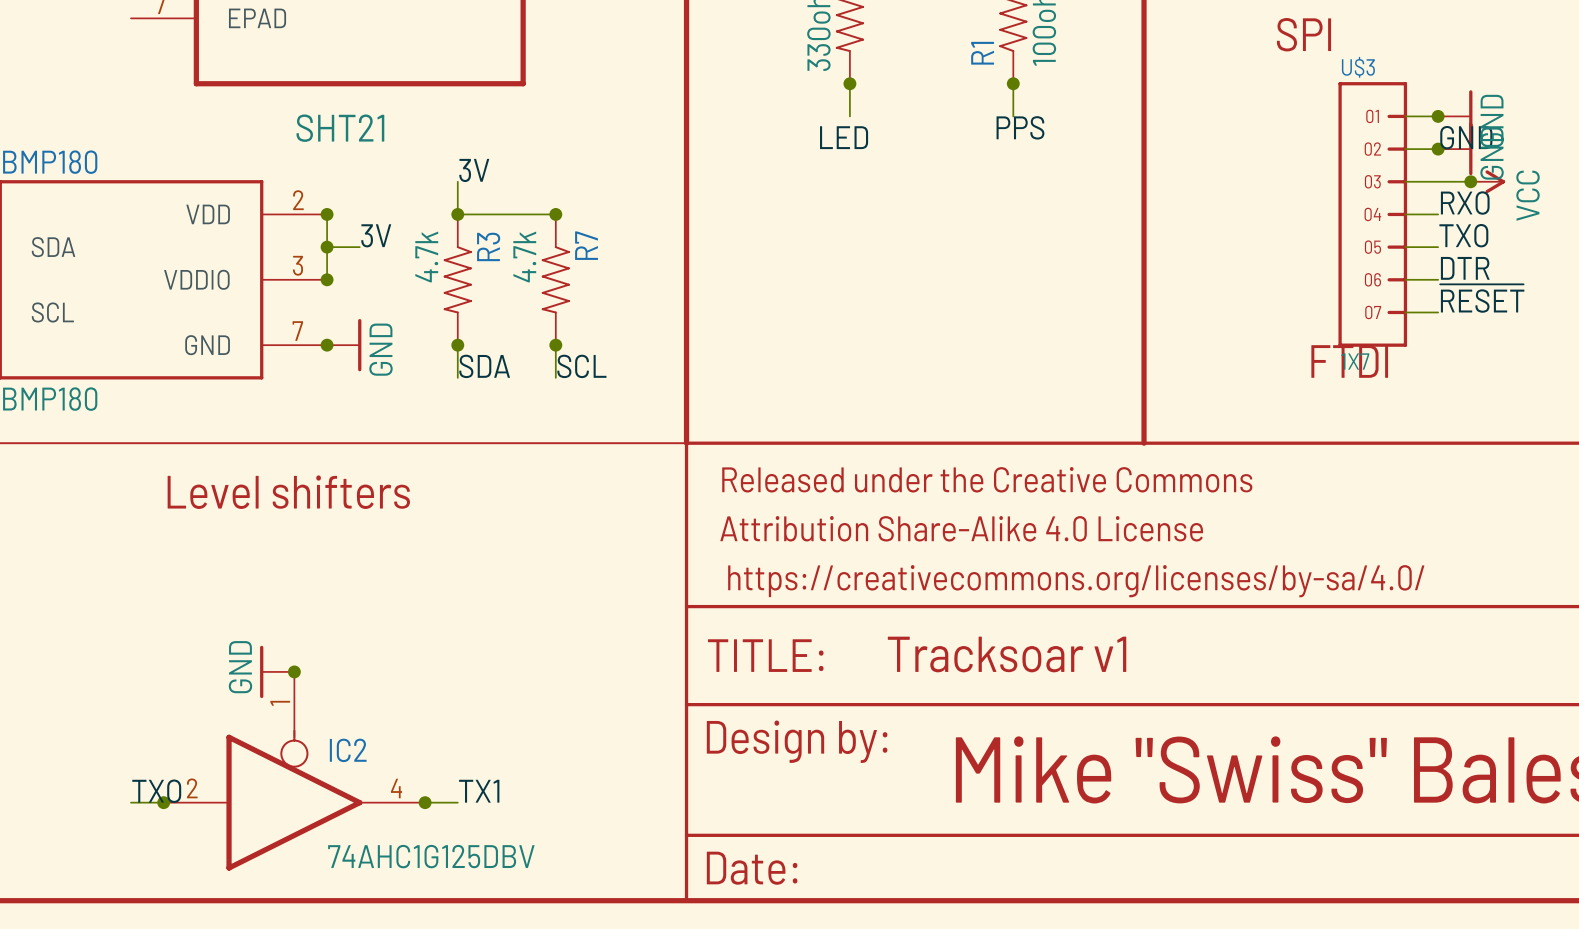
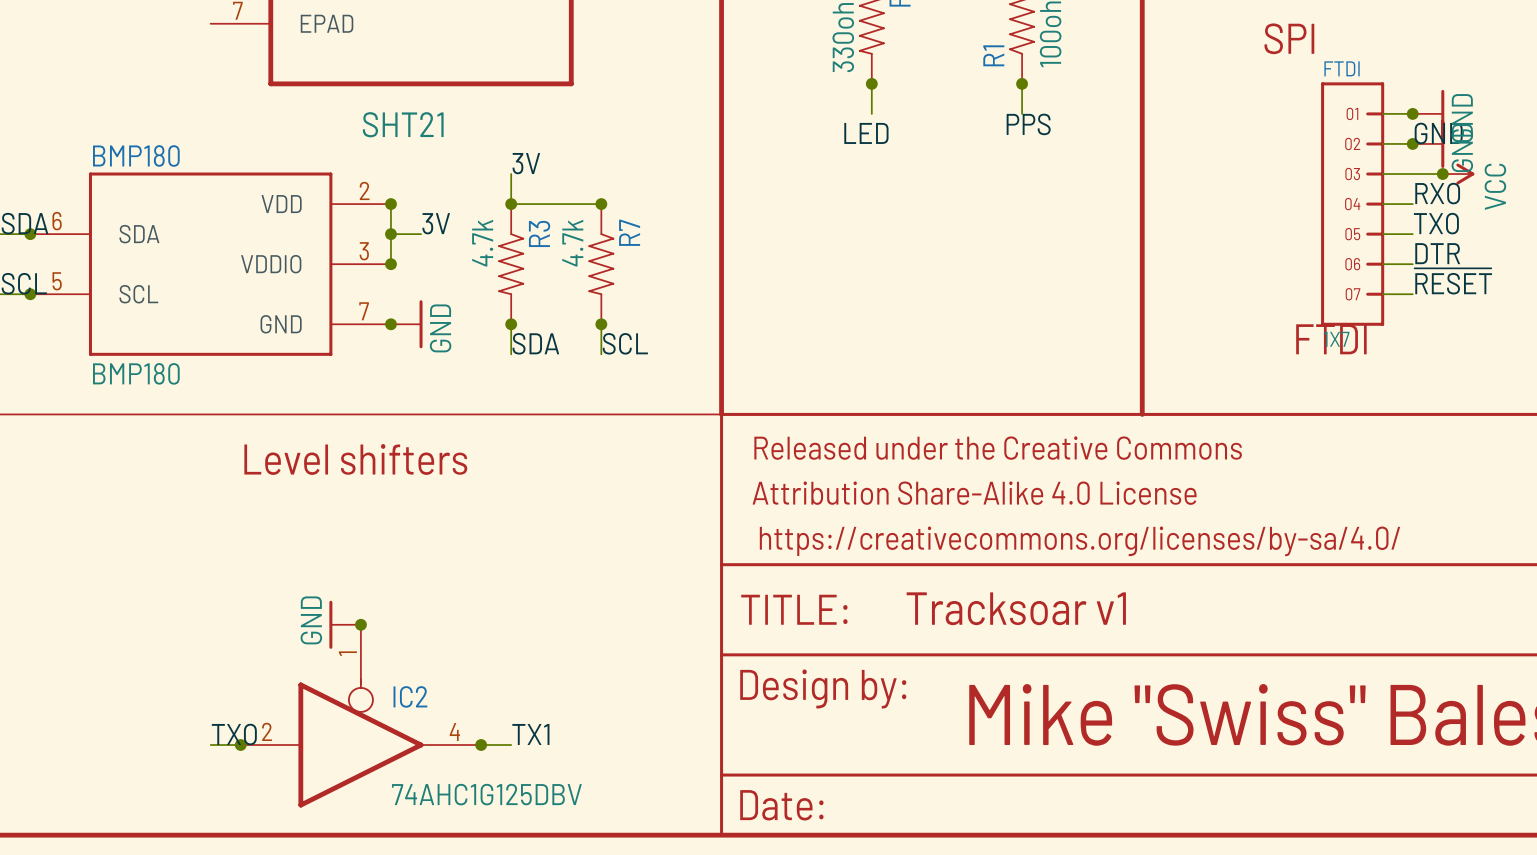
U$3 name: U$3 (1358, 67) -> FTDI (1342, 68)

